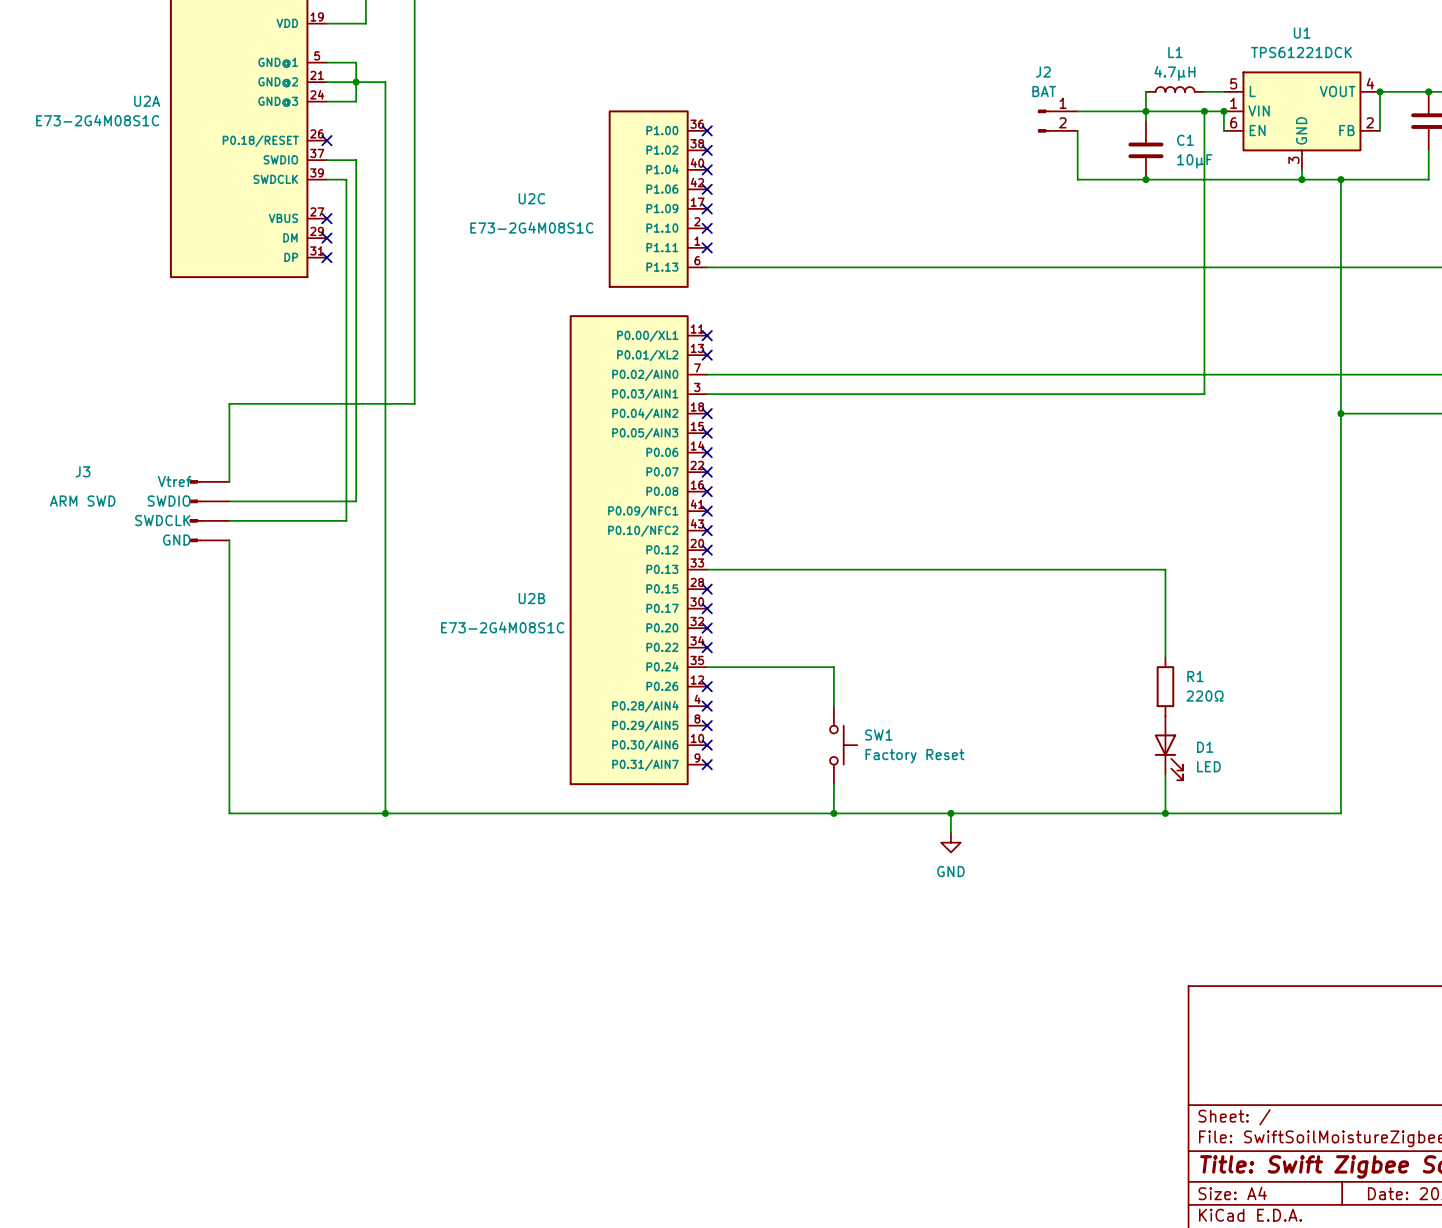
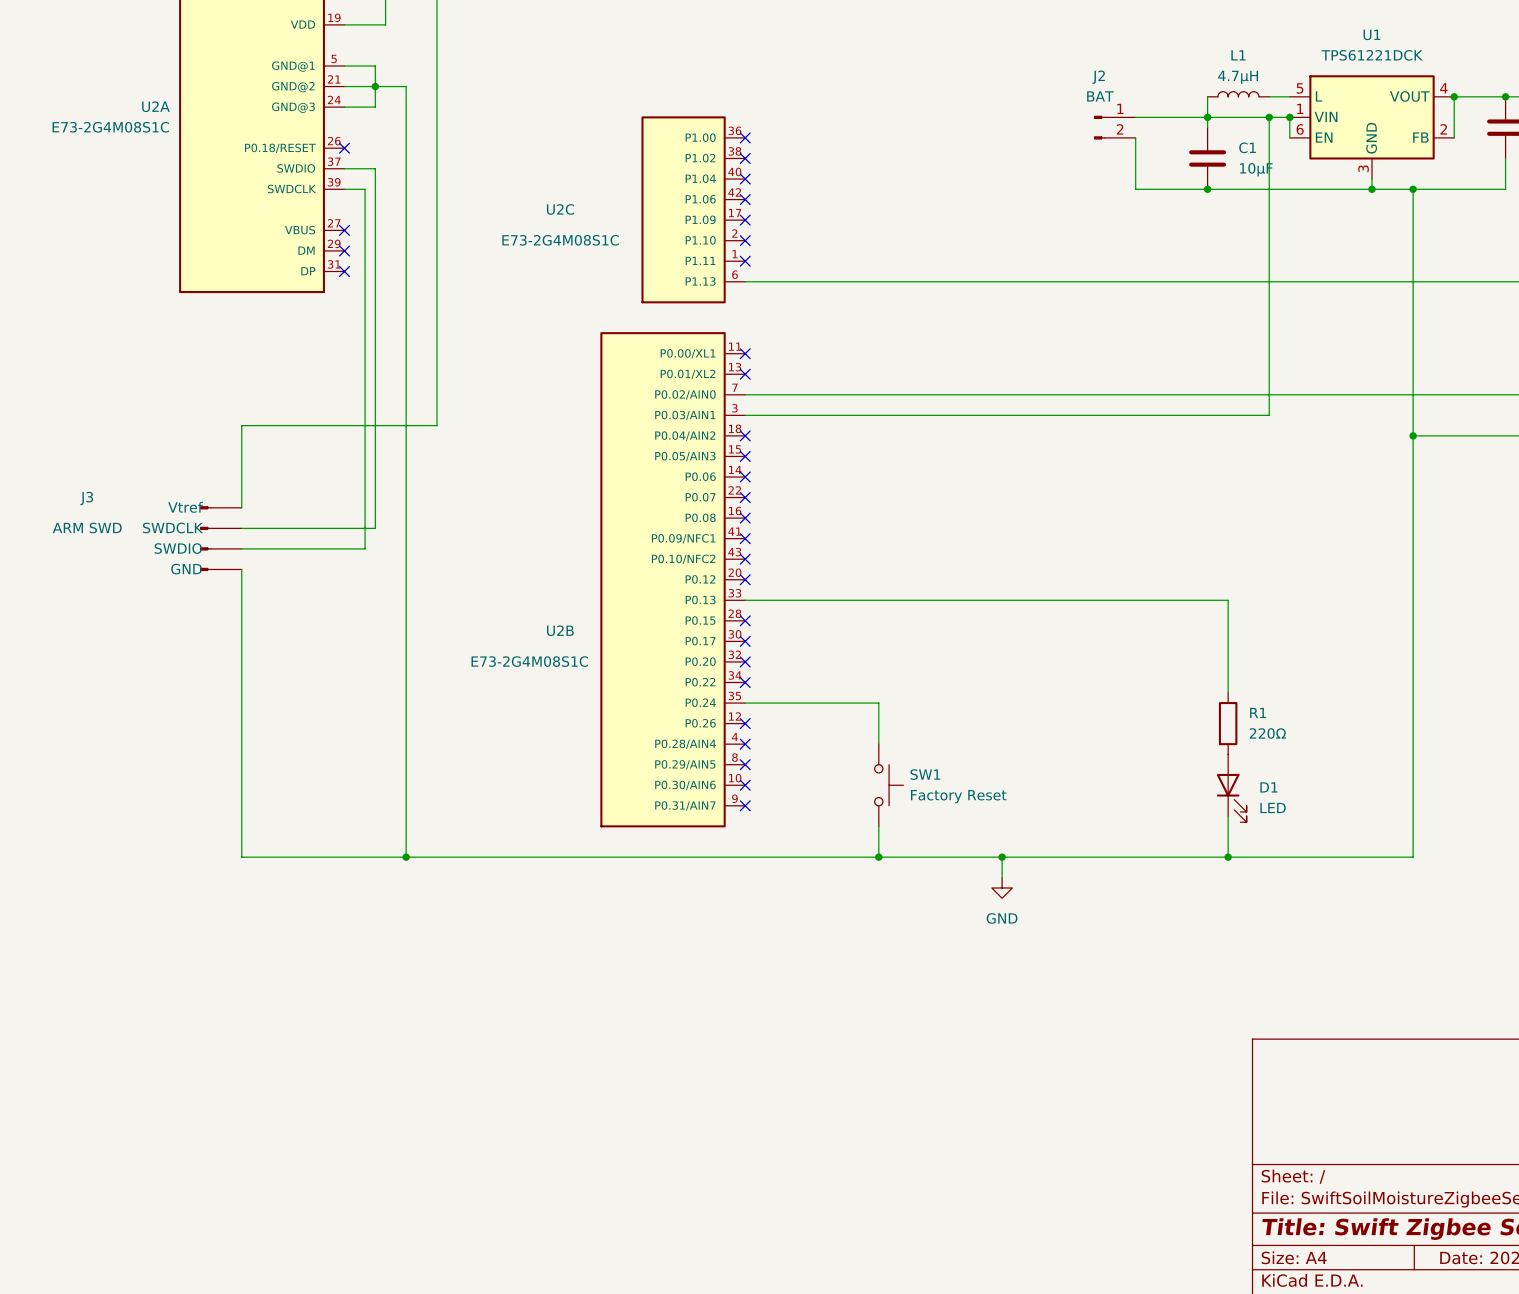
J3 pin name: SWDIO (169, 501) -> SWDCLK (172, 528)
J3 pin name: SWDCLK (162, 520) -> SWDIO (178, 548)

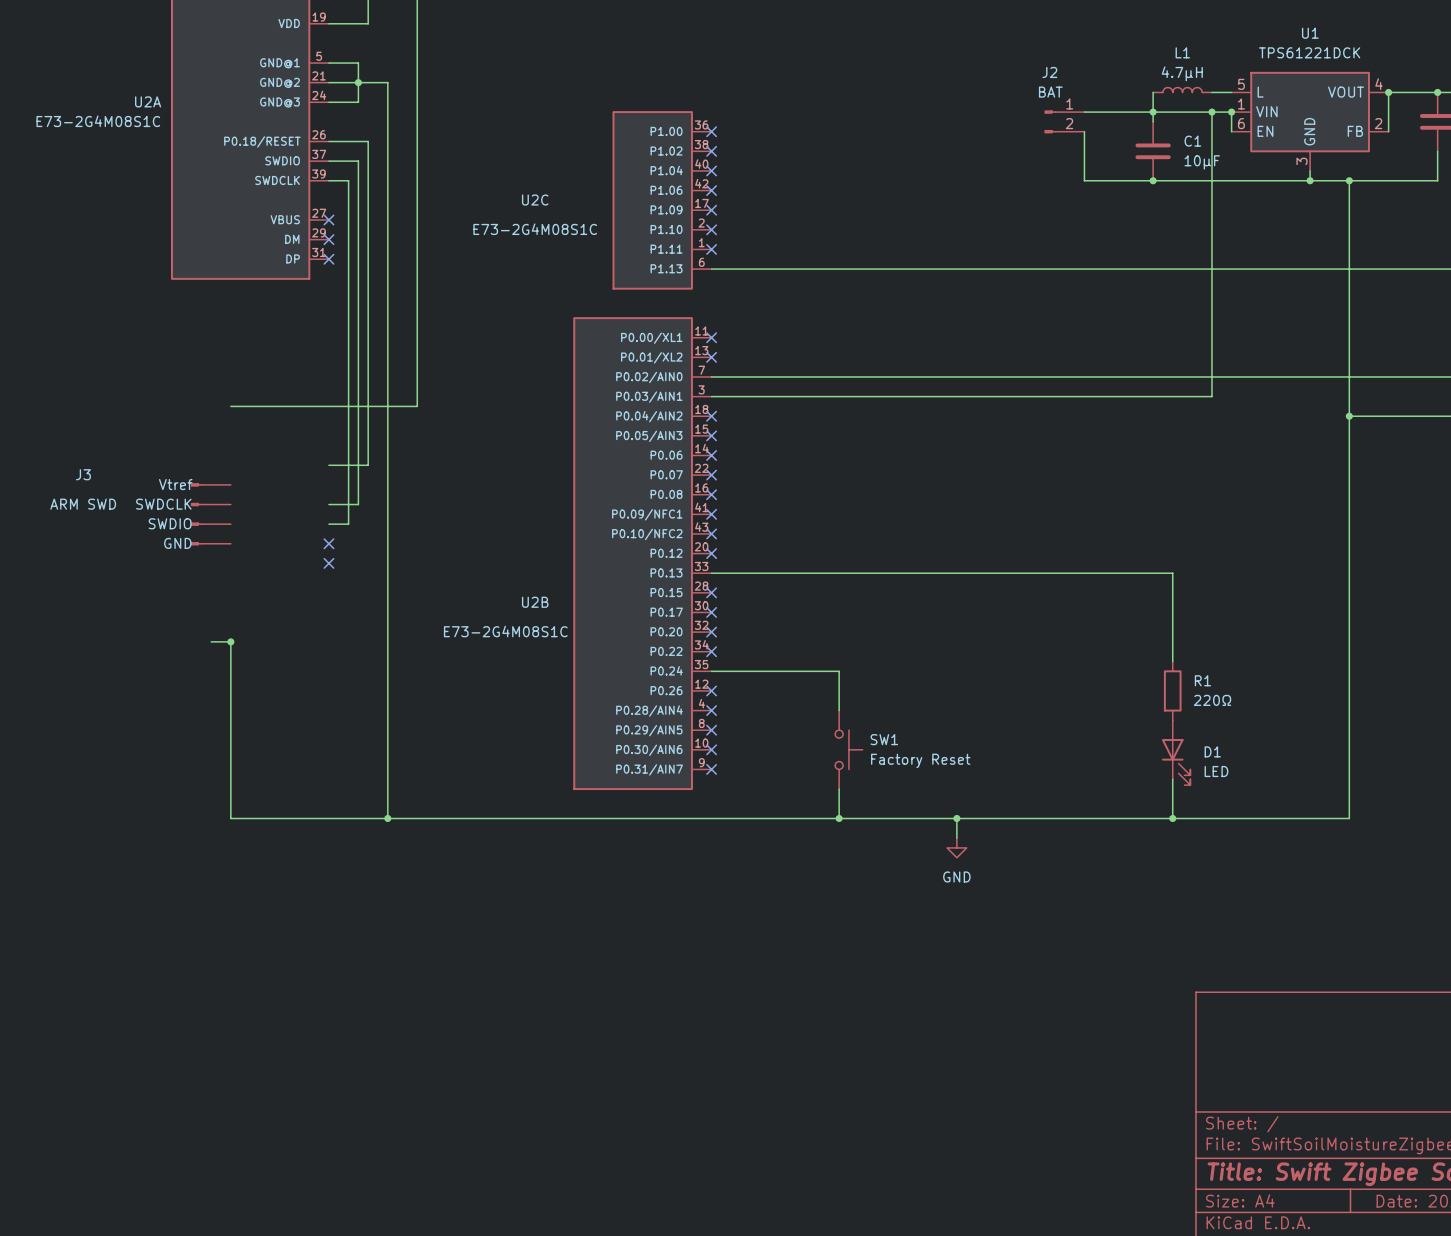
wire: none -> (328, 141) (368, 141) (368, 465) (328, 465)
no-connect mark: (344, 148) -> none
wire: (241, 425) (241, 507) -> none
wire: (241, 528) (344, 528) -> none
wire: (241, 548) (344, 548) -> none
wire: (241, 569) (241, 672) -> (211, 641) (230, 641)
no-connect mark: none -> (328, 543)
no-connect mark: none -> (328, 563)
junction: none -> (230, 641)

